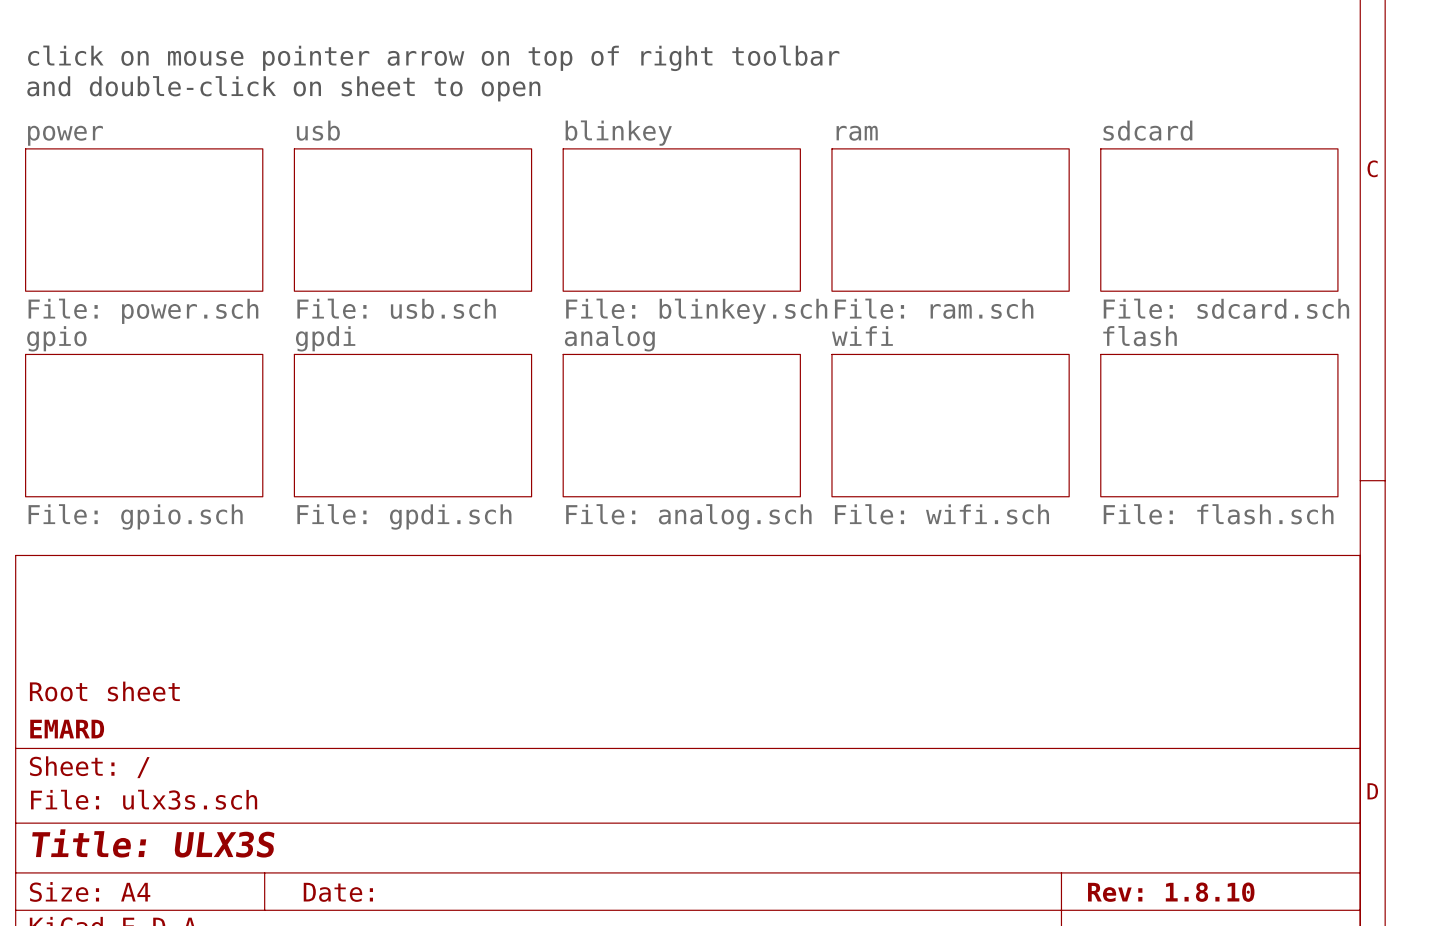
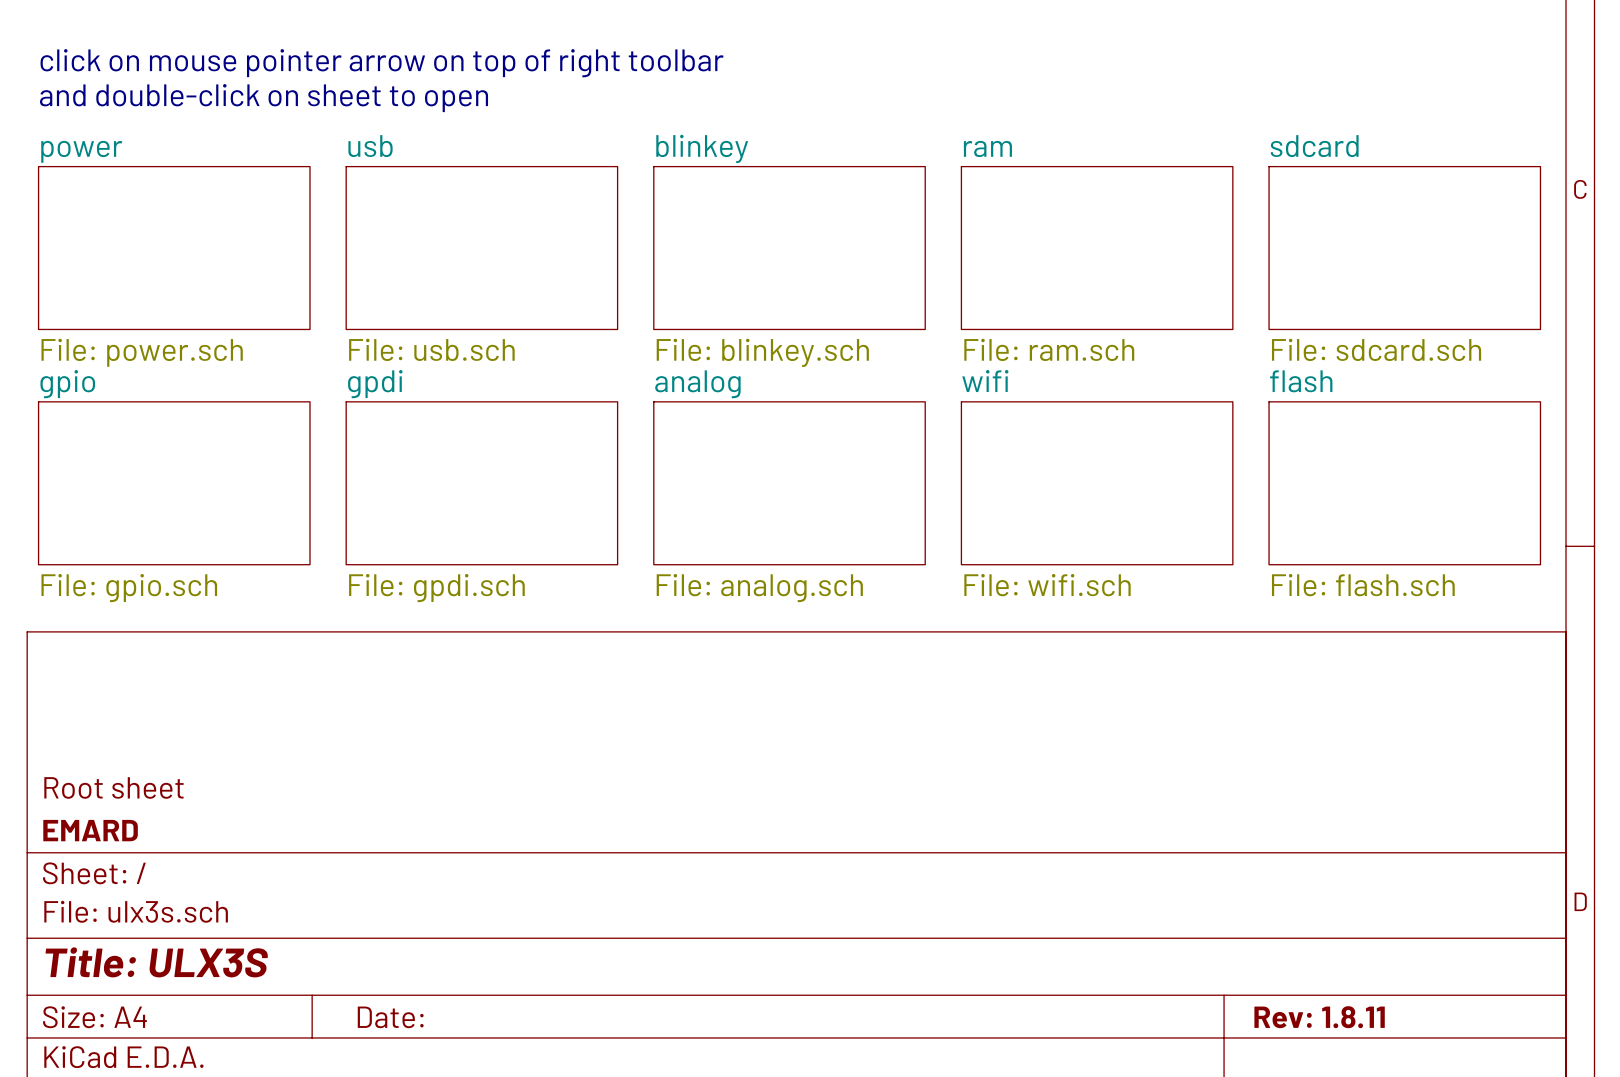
title block: Rev: 1.8.10 (1171, 892) -> Rev: 1.8.11 (1319, 1017)

